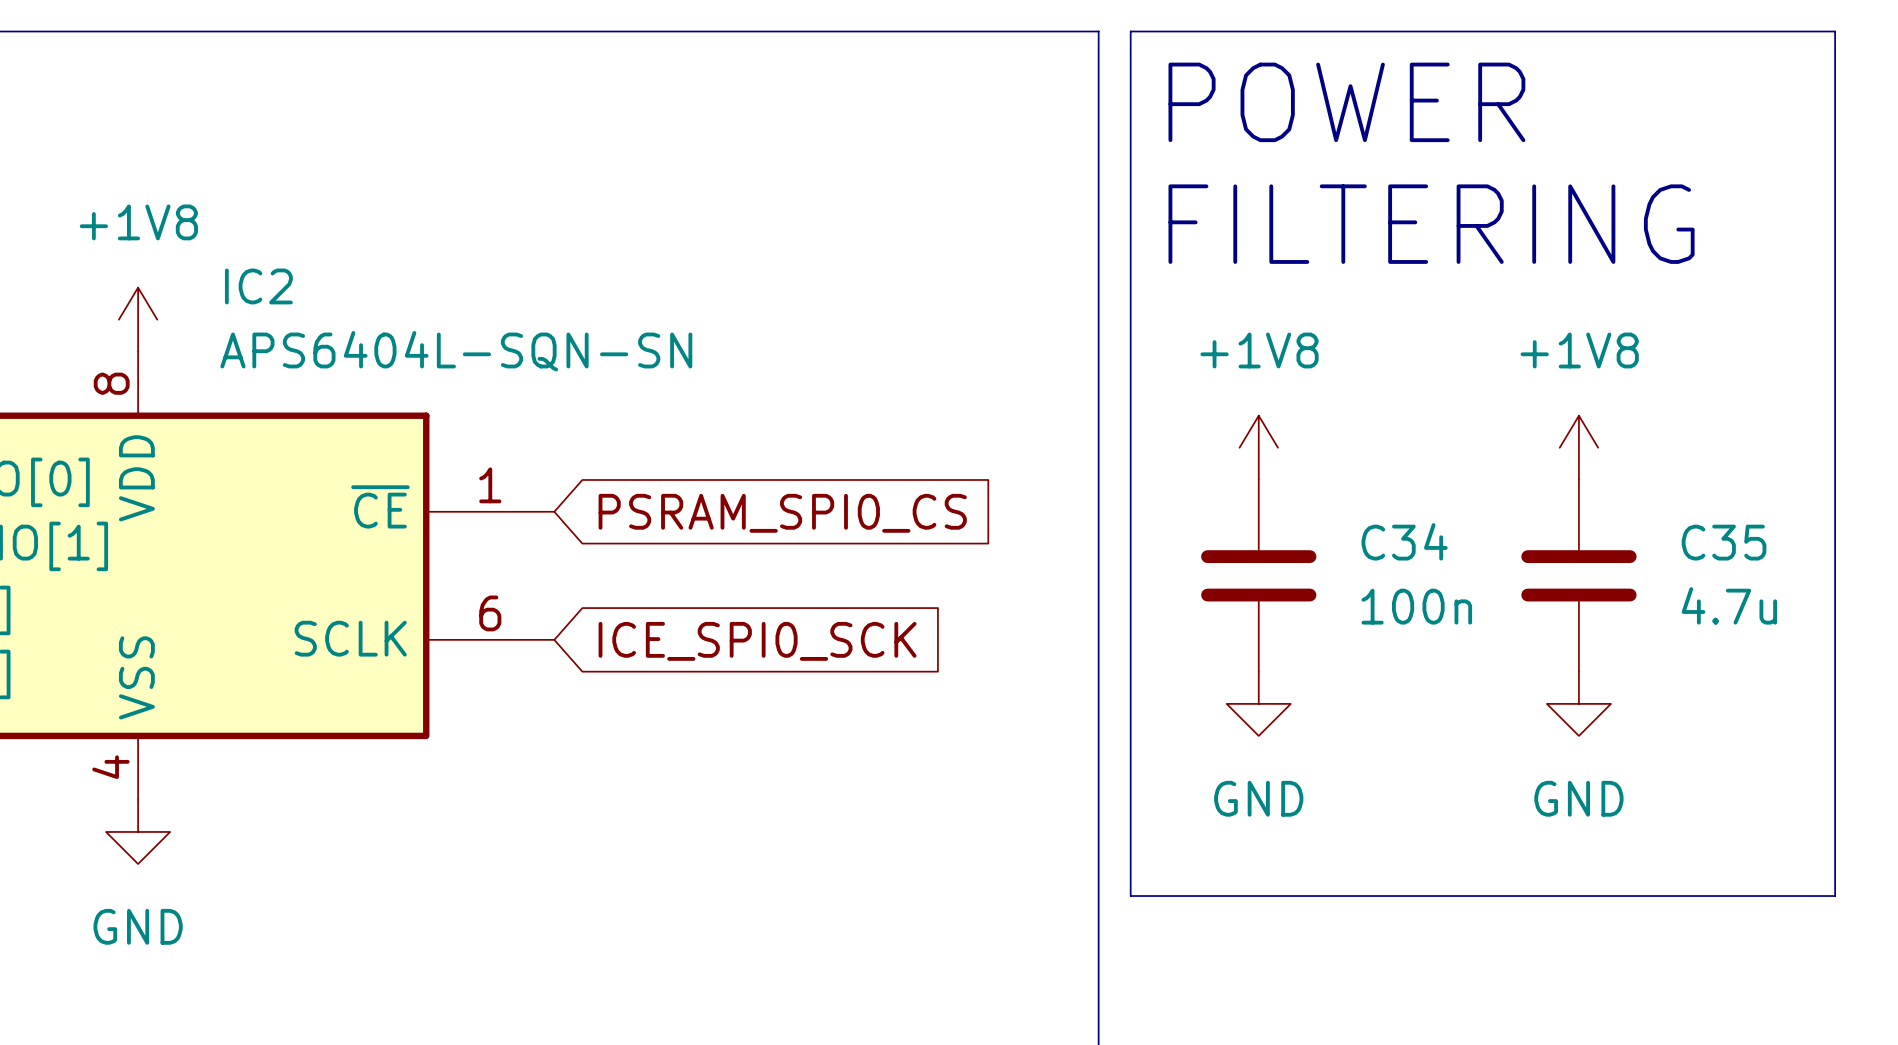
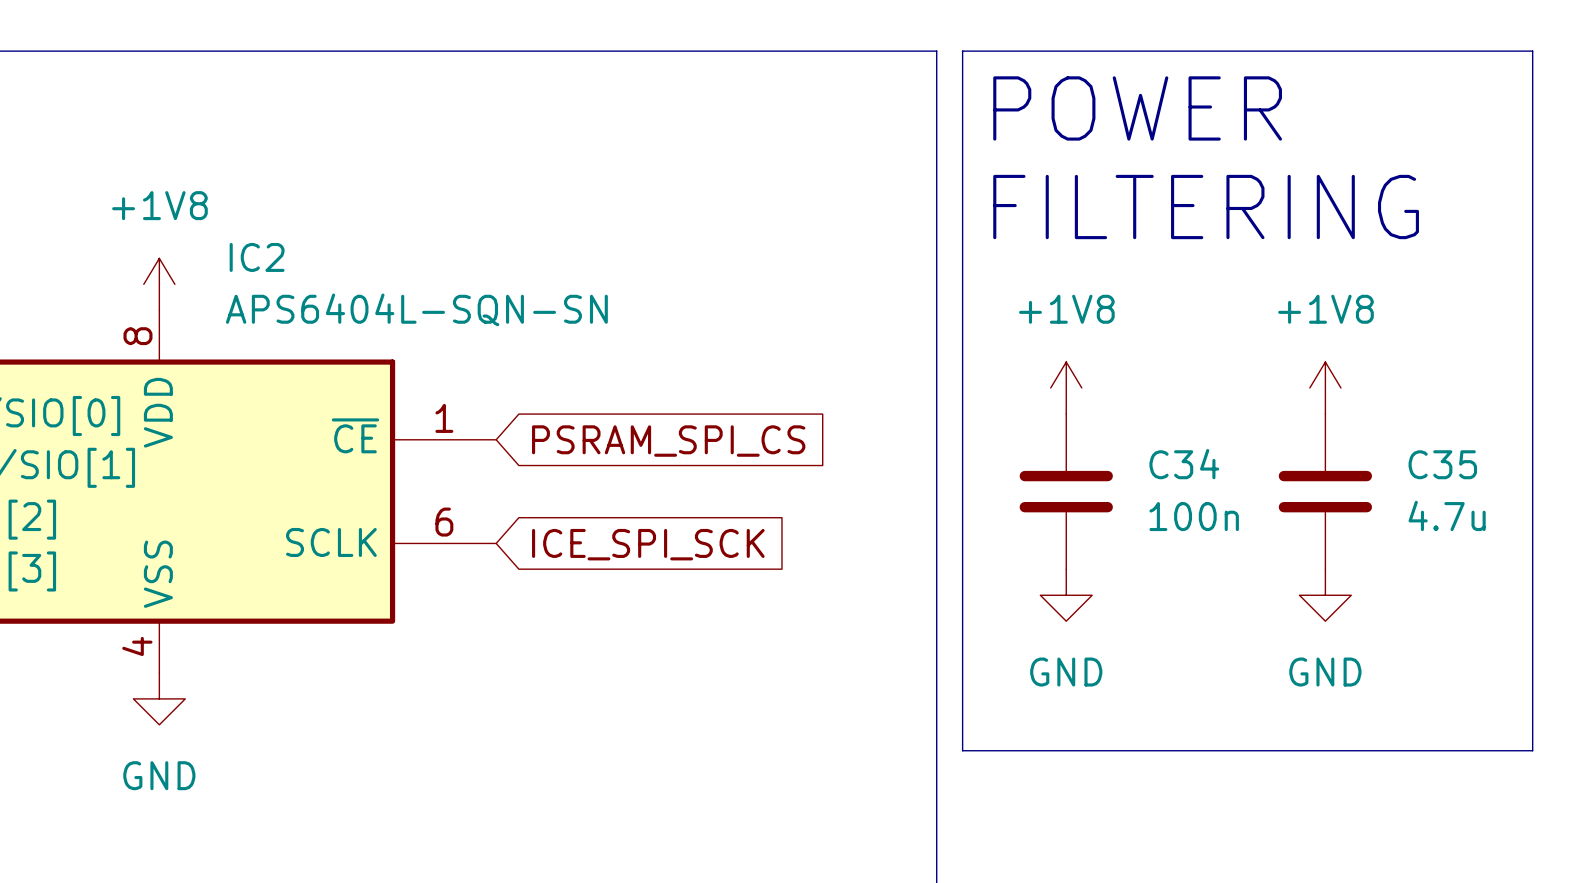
global label: PSRAM_SPI0_CS (782, 513) -> PSRAM_SPI_CS (668, 441)
global label: ICE_SPI0_SCK (757, 641) -> ICE_SPI_SCK (648, 544)

